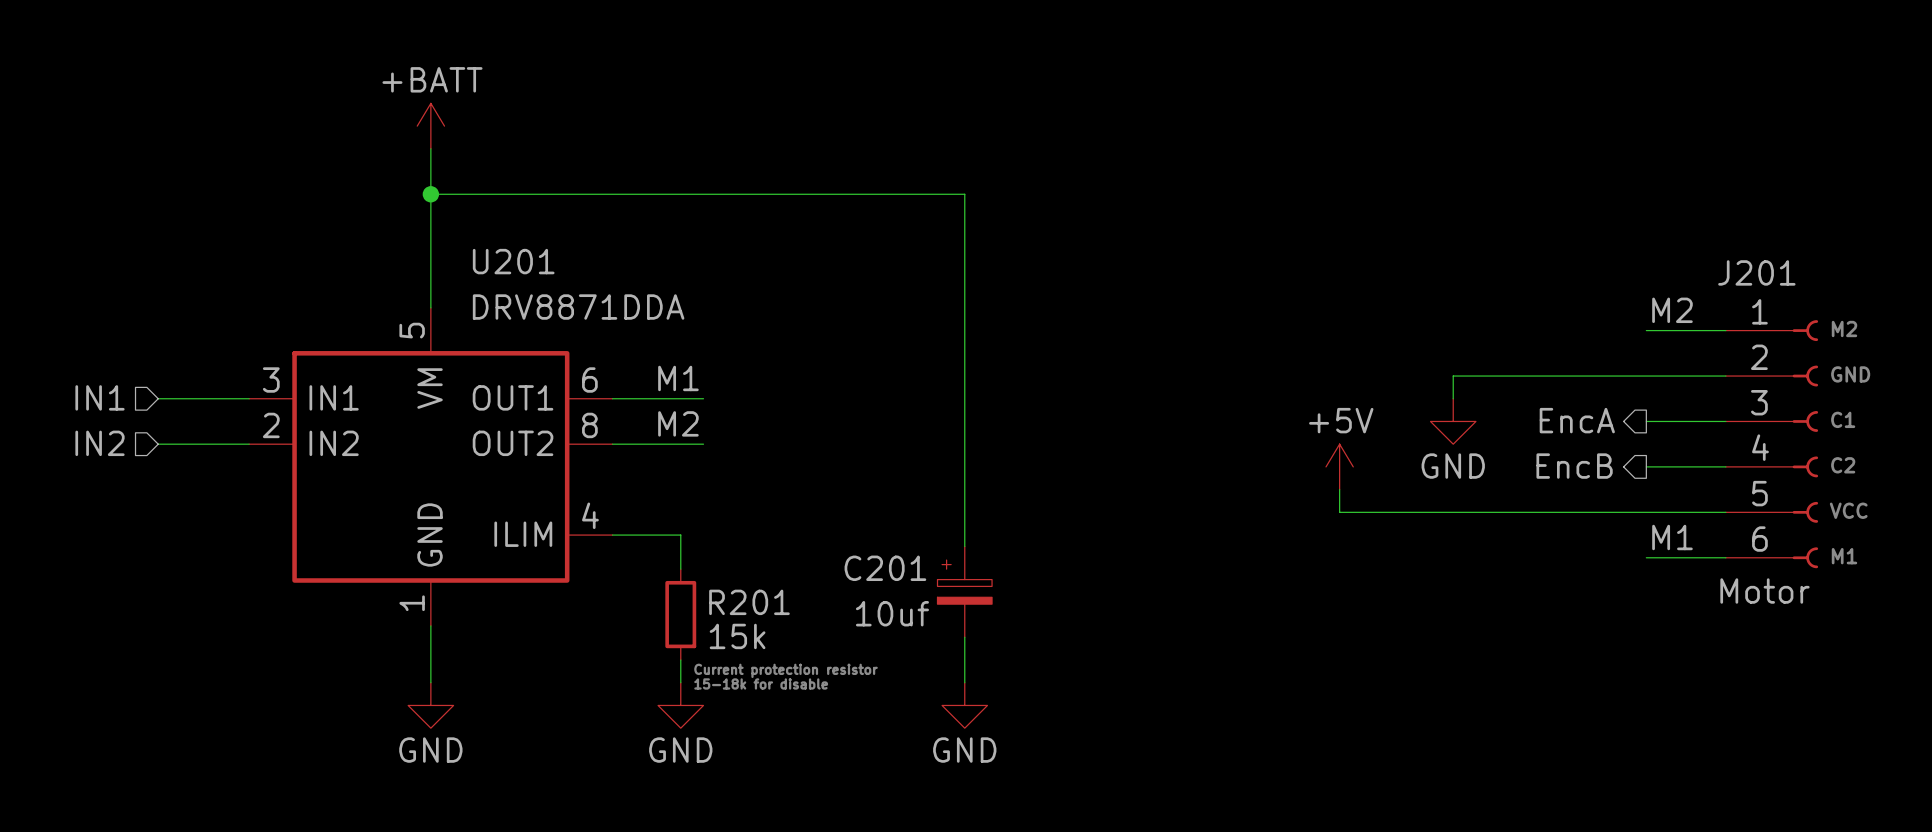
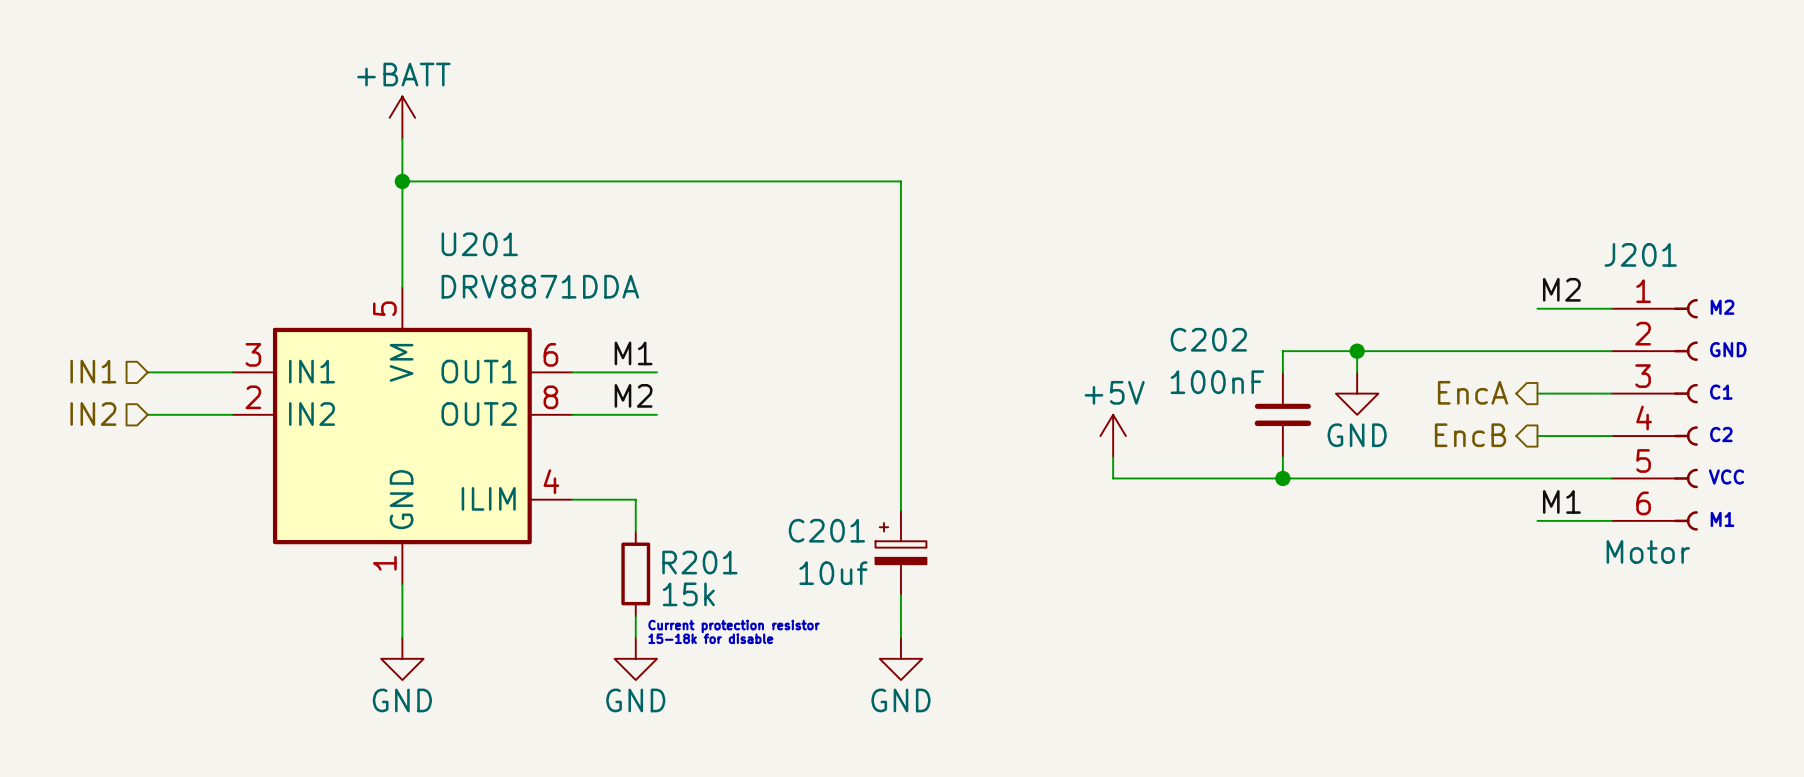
wire: none -> (1357, 351) (1282, 351) (1282, 372)
junction: none -> (1357, 351)
C202: none -> 100nF (1282, 414)
power symbol position: +5V (1339, 466) -> +5V (1113, 436)
wire: (1339, 489) (1339, 512) -> (1113, 457) (1113, 478) (1251, 478)
wire: none -> (1282, 457) (1282, 478)
junction: none -> (1282, 478)

